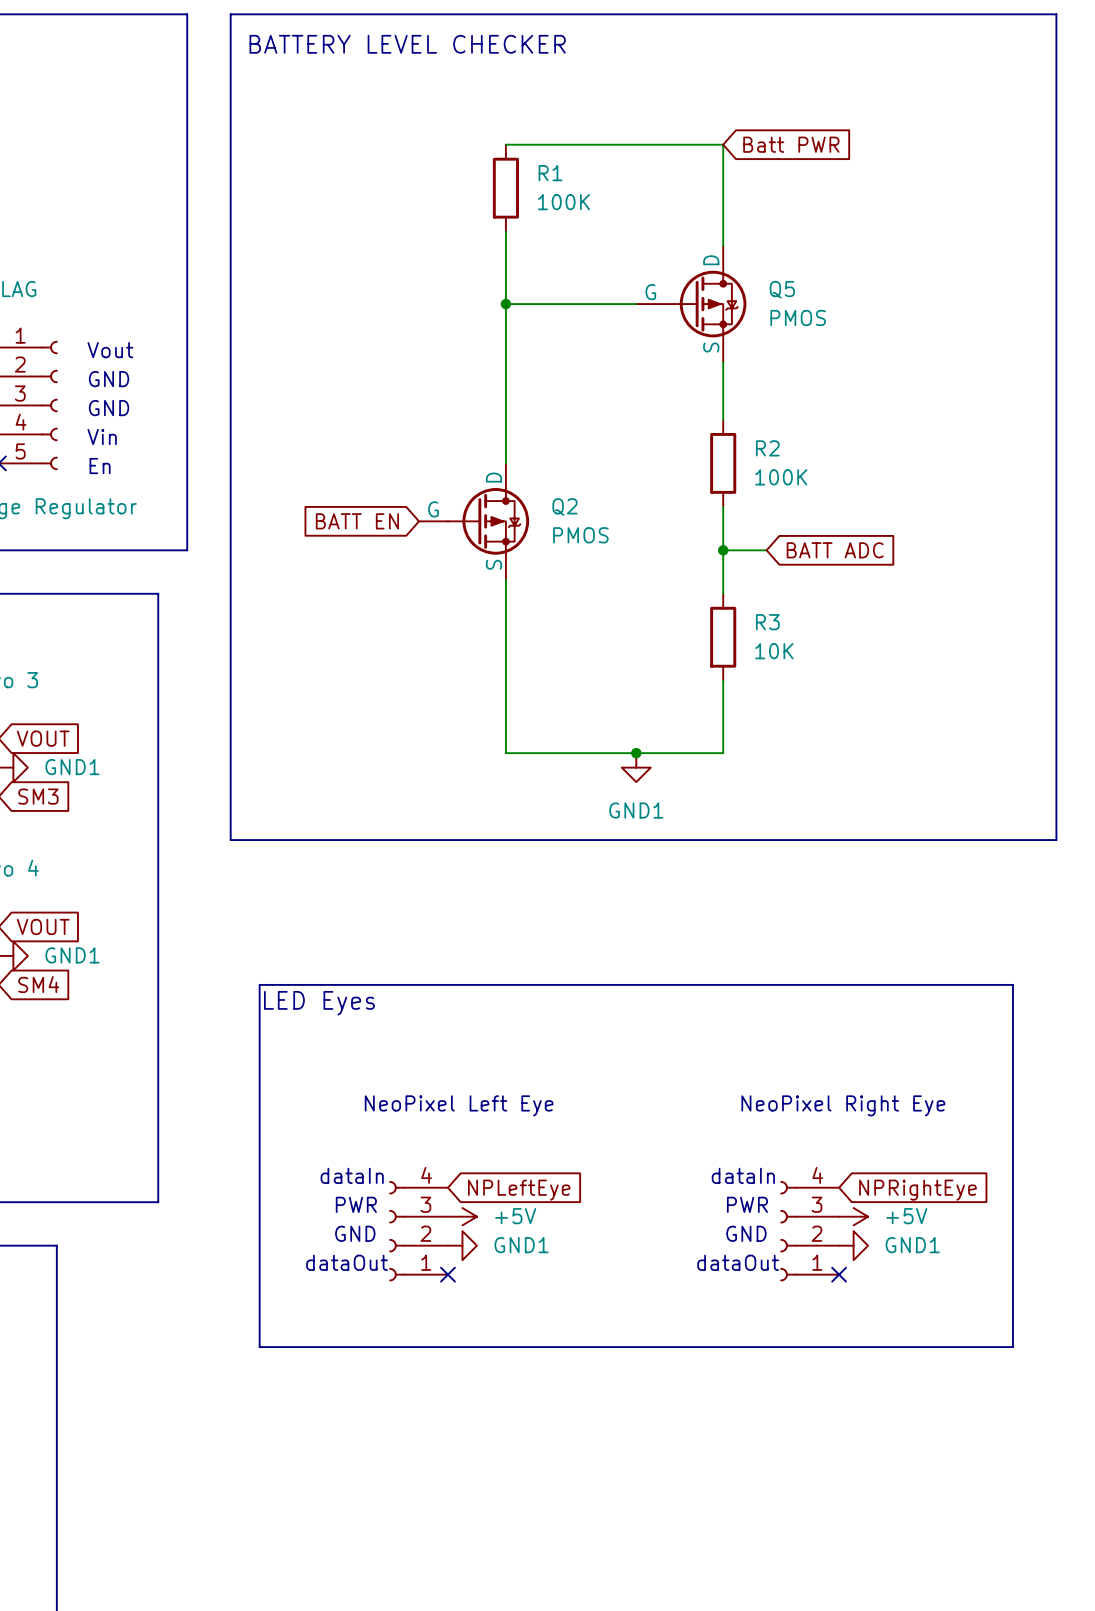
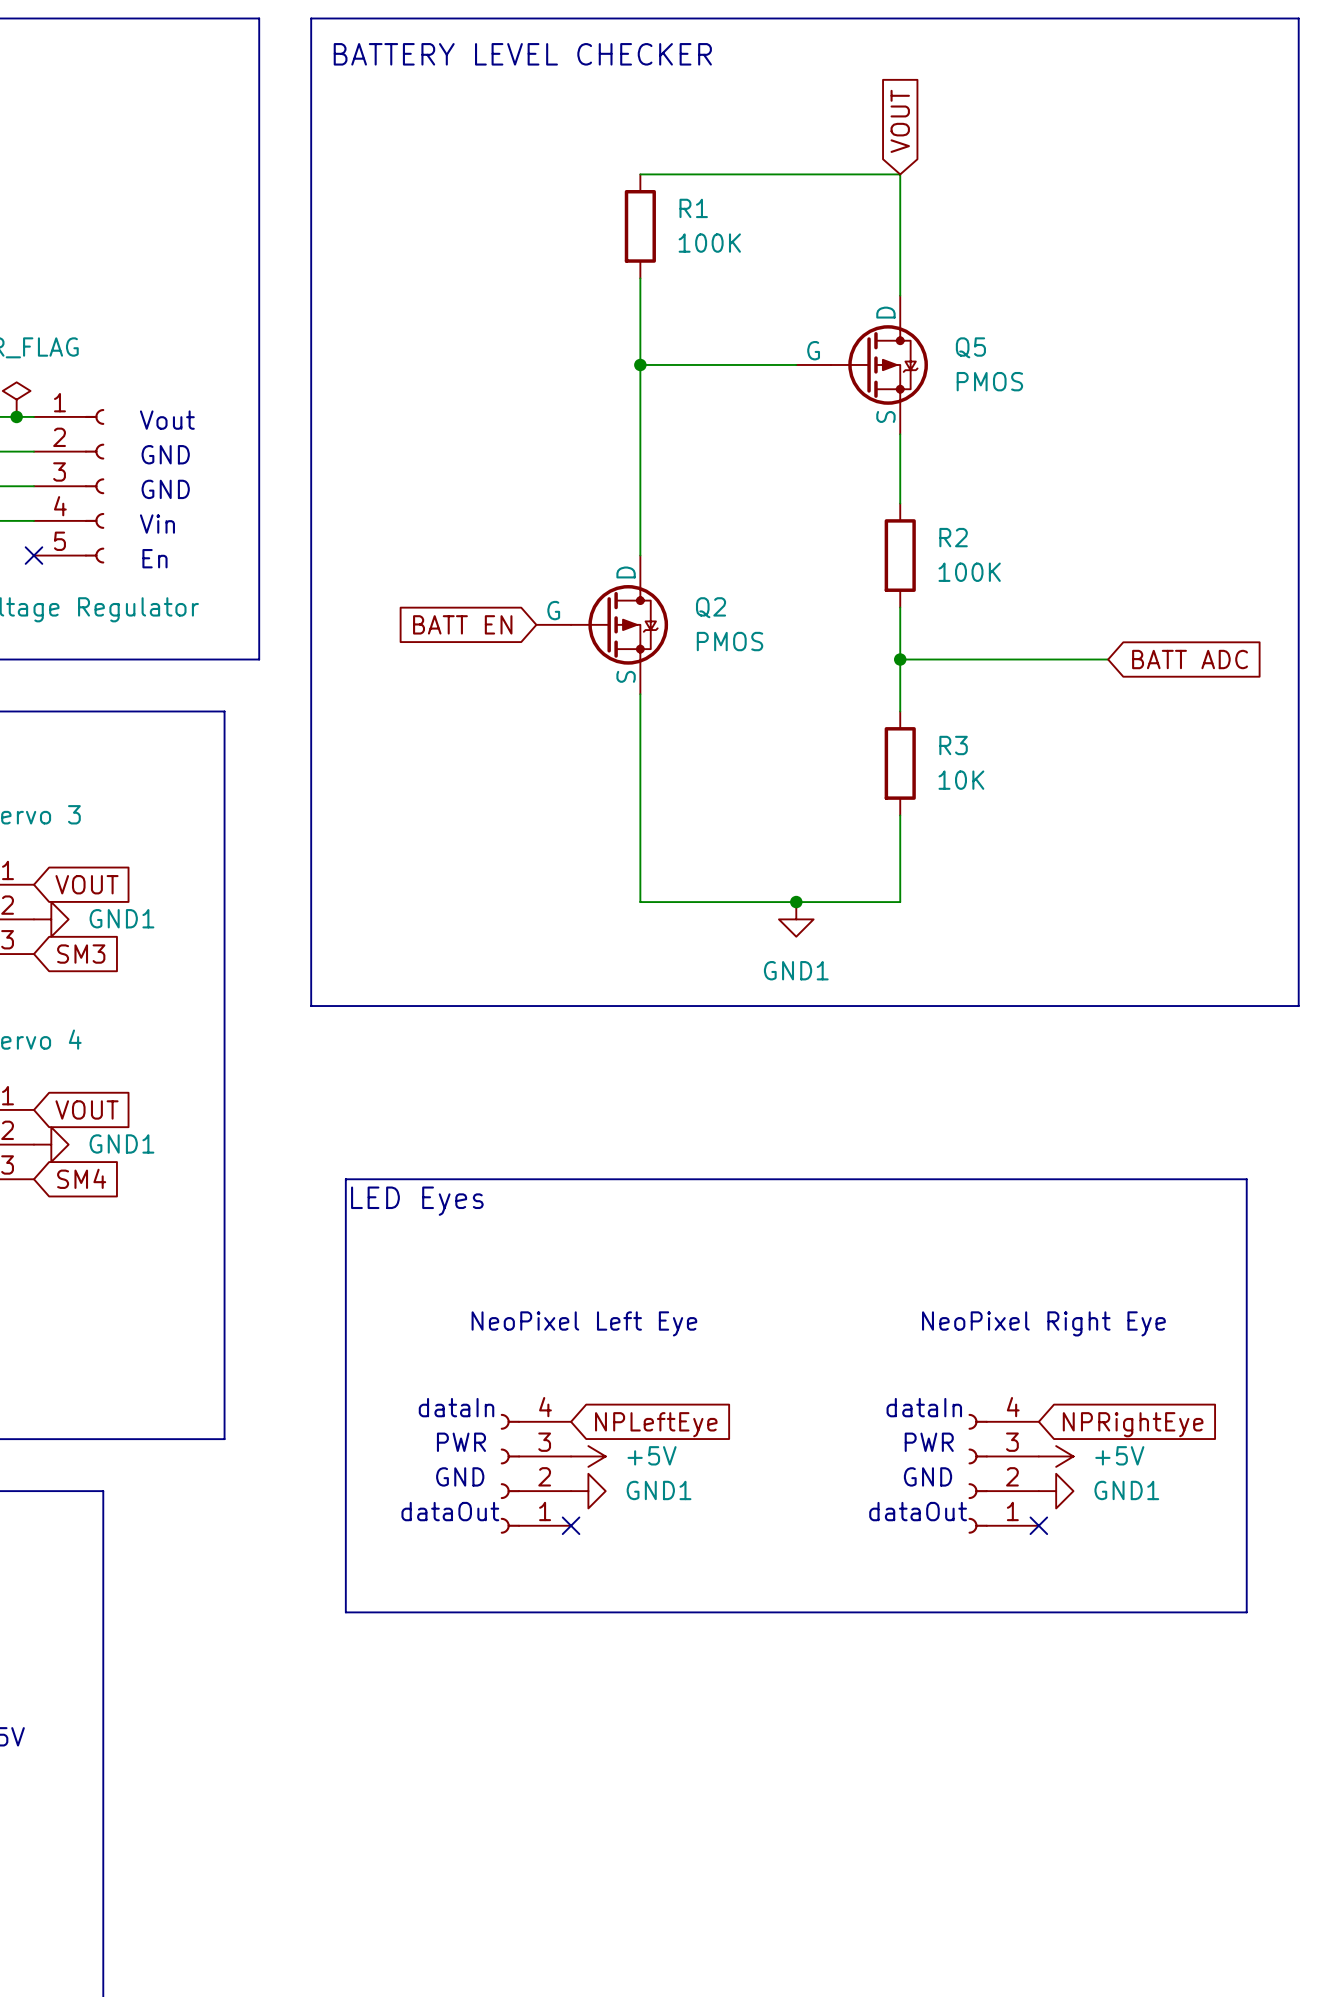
global label: Batt PWR (791, 144) -> VOUT (900, 121)
wire: none -> (952, 659) (1108, 659)
global label position: BATT ADC (835, 550) -> BATT ADC (1190, 659)

